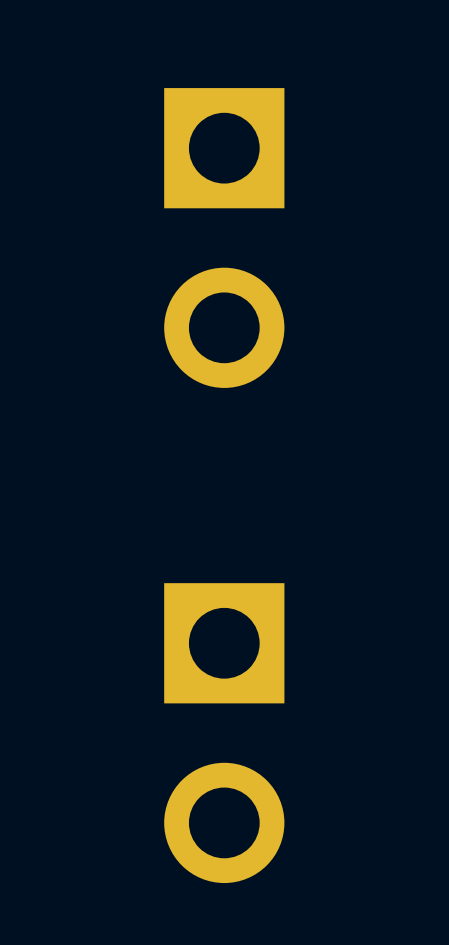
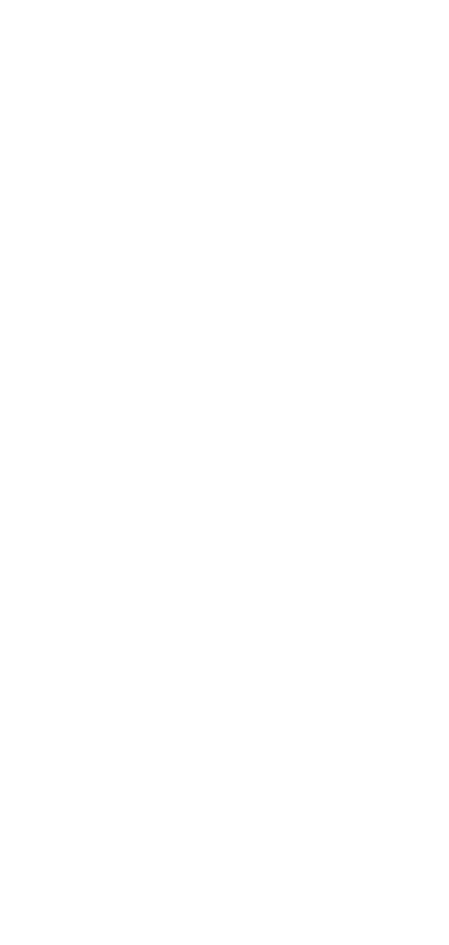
part: (224, 238) -> none
part: (224, 733) -> none

